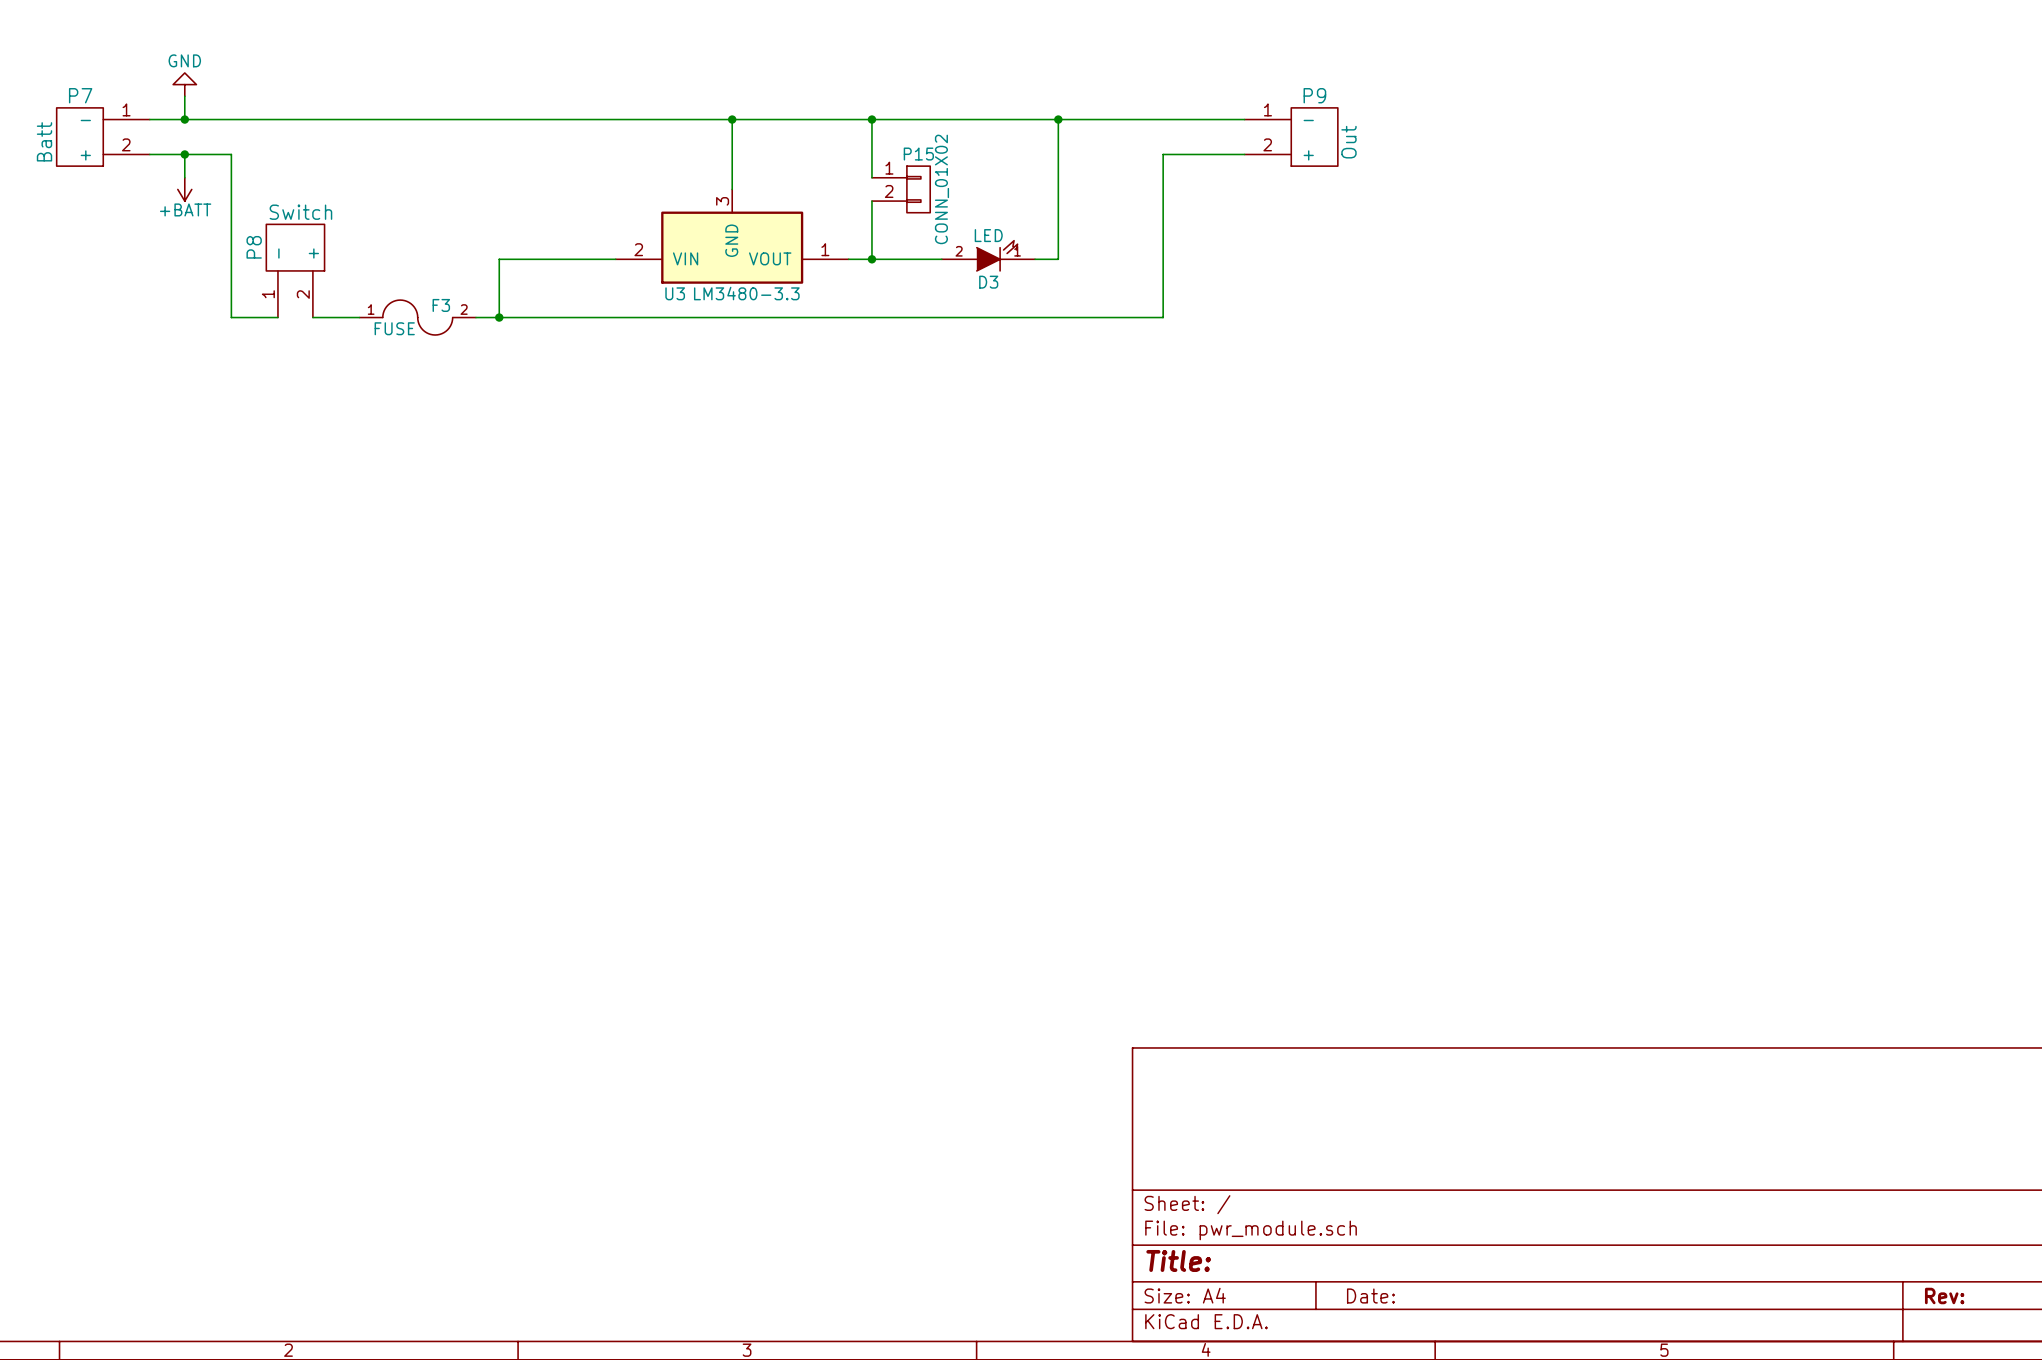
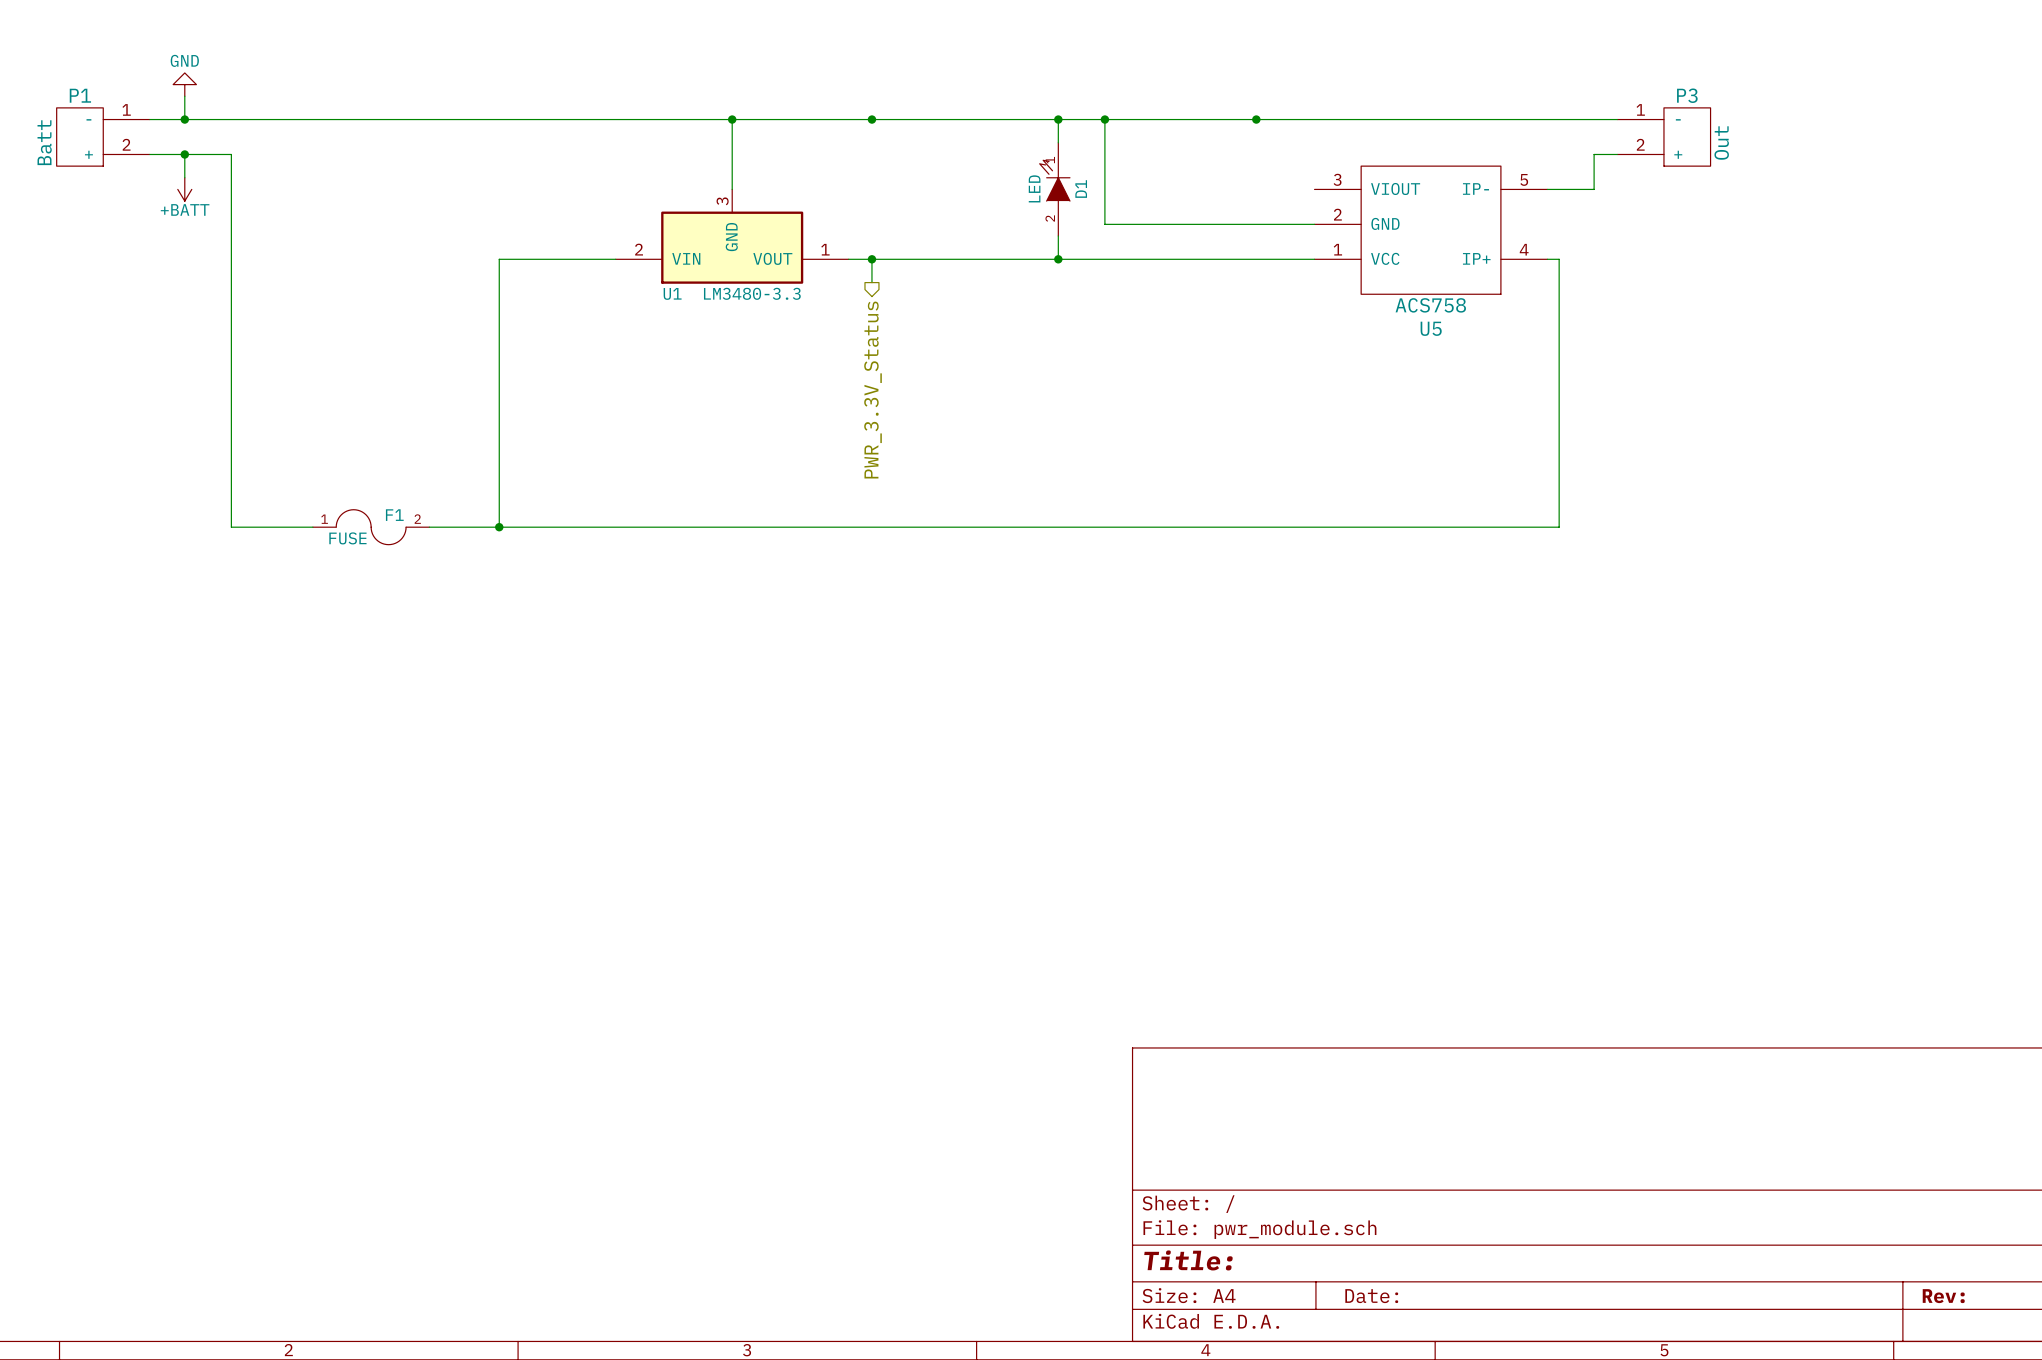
P7 name: P7 (80, 95) -> P1 (80, 95)
wire: (871, 119) (871, 177) -> none
wire: none -> (1104, 119) (1104, 224) (1314, 224)
junction: none -> (1104, 119)
wire: none -> (1244, 119) (1617, 119)
junction: none -> (1256, 119)
P9: Out (1291, 137) -> none
P3: none -> Out (1663, 137)
wire: (1244, 154) (1163, 154) (1163, 317) (475, 317) -> none
wire: none -> (1617, 154) (1594, 154) (1594, 189) (1547, 189)
P15: CONN_01X02 (901, 189) -> none
D1: none -> LED (1054, 189)
wire: (871, 201) (871, 259) -> (871, 282) (871, 259)
U5: none -> ACS758 (1431, 230)
D3: LED (988, 255) -> none
wire: none -> (1058, 259) (1314, 259)
junction: none -> (1058, 259)
wire: none -> (1547, 259) (1559, 259) (1559, 527) (429, 527)
P8: Switch (295, 270) -> none
U3 name: U3 (675, 293) -> U1 (672, 293)
wire: (231, 317) (277, 317) -> (231, 317) (231, 527) (312, 527)
wire: (312, 317) (359, 317) -> none
F3: FUSE (417, 317) -> none
wire: none -> (499, 317) (499, 527)
junction: (499, 317) -> none
hierarchical label: none -> PWR_3.3V_Status (873, 390)
F1: none -> FUSE (371, 527)
junction: none -> (499, 527)

